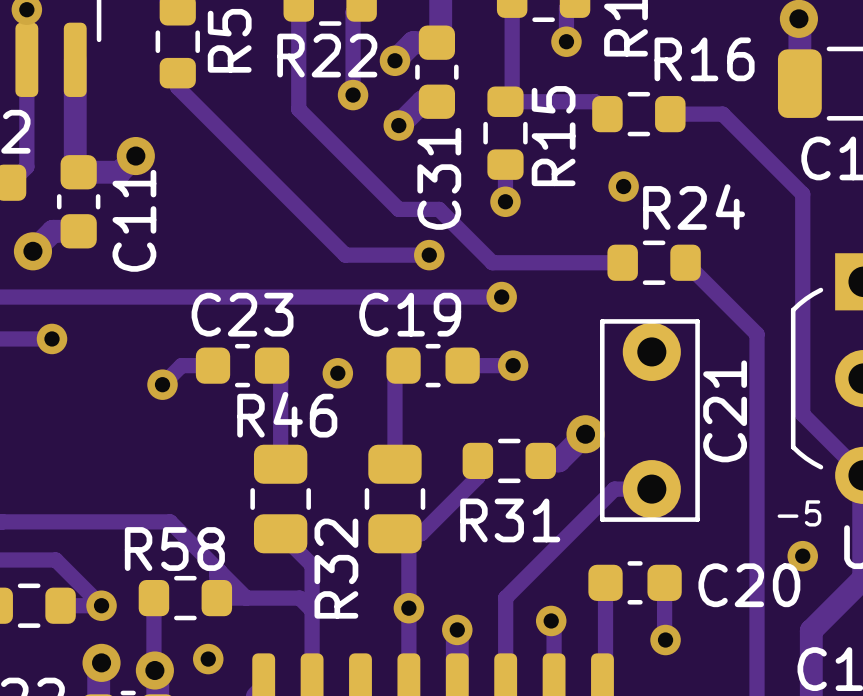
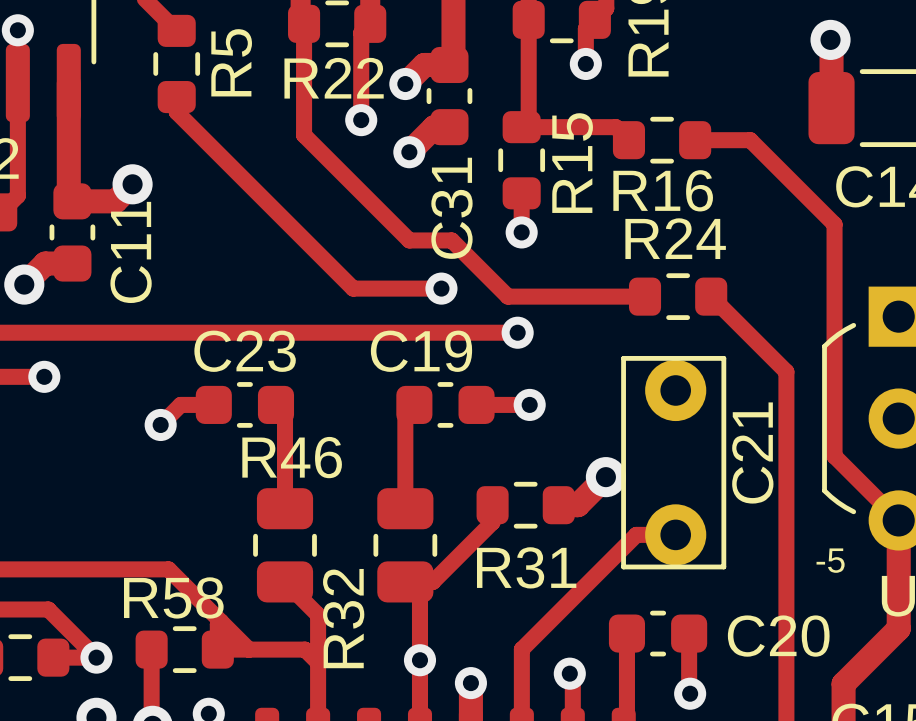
R16 name position: R16 (704, 59) -> R16 (663, 190)
via: (623, 186) -> none
R24 name position: R24 (694, 207) -> R24 (675, 238)
via: (337, 373) -> none
via: (802, 556) -> none

